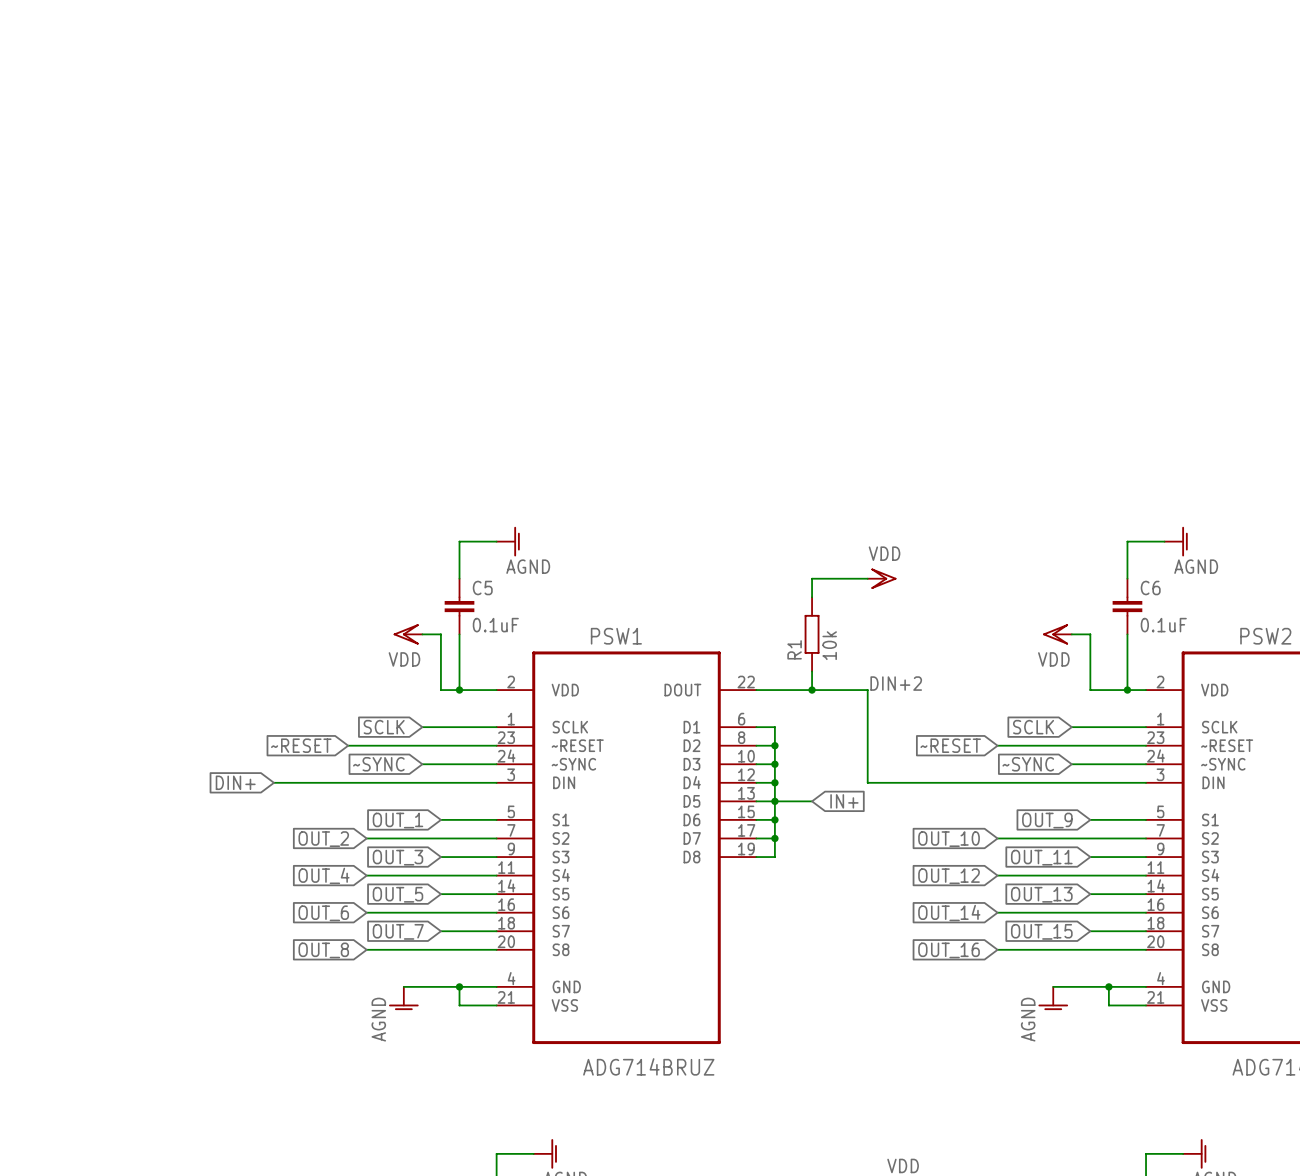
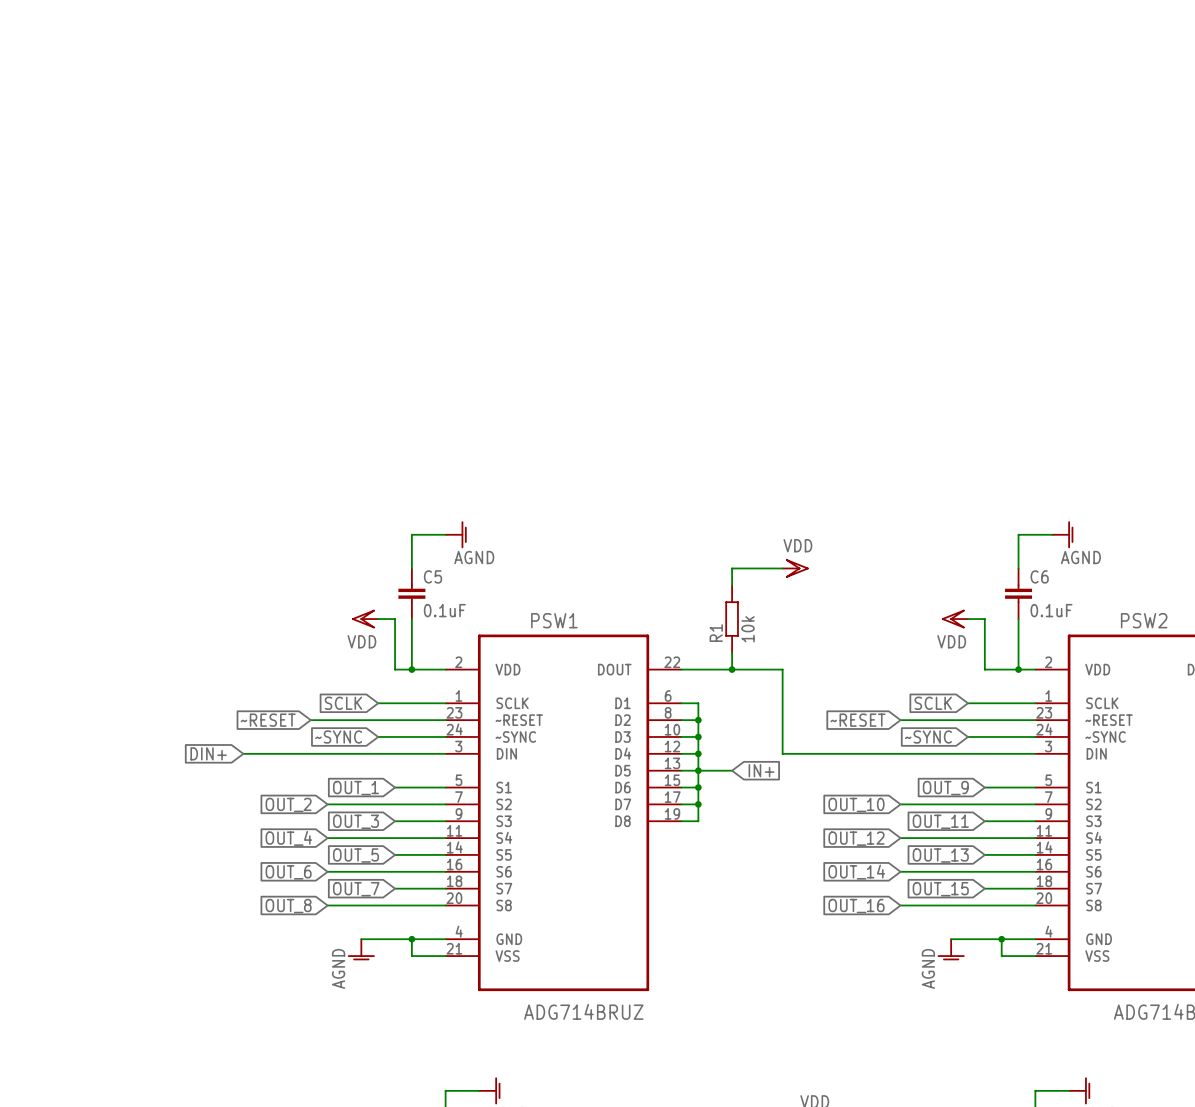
label: DIN+2 (896, 683) -> none

